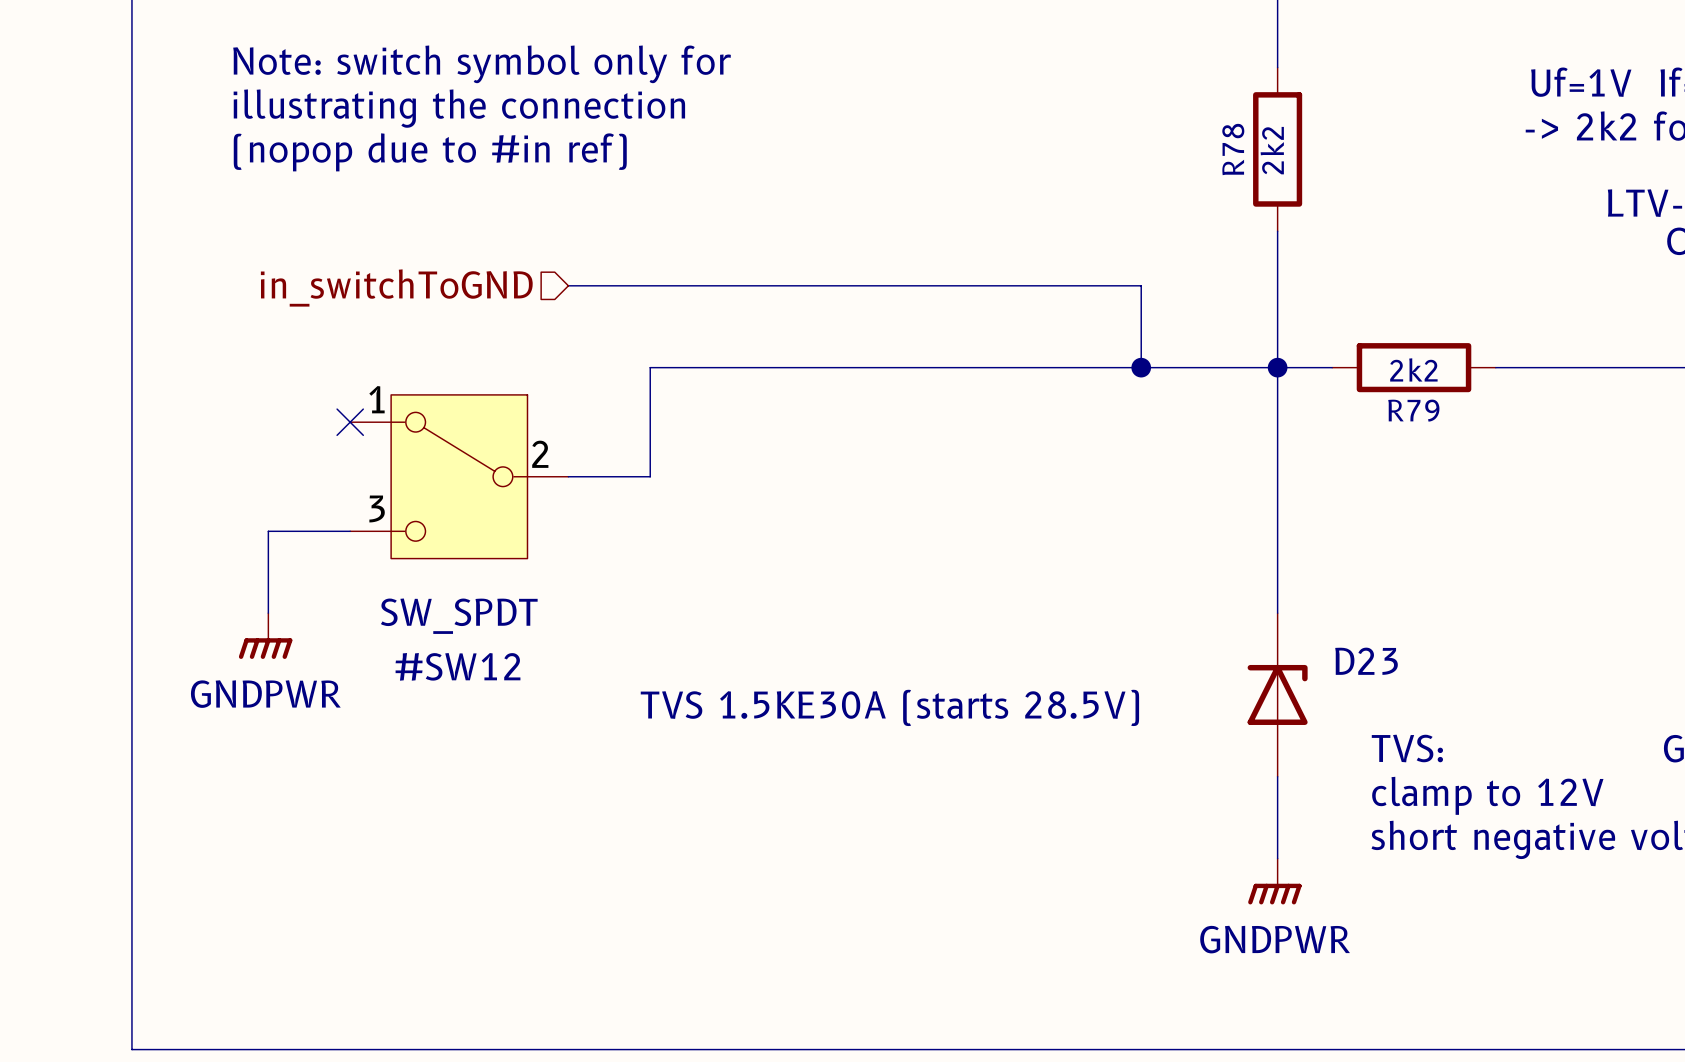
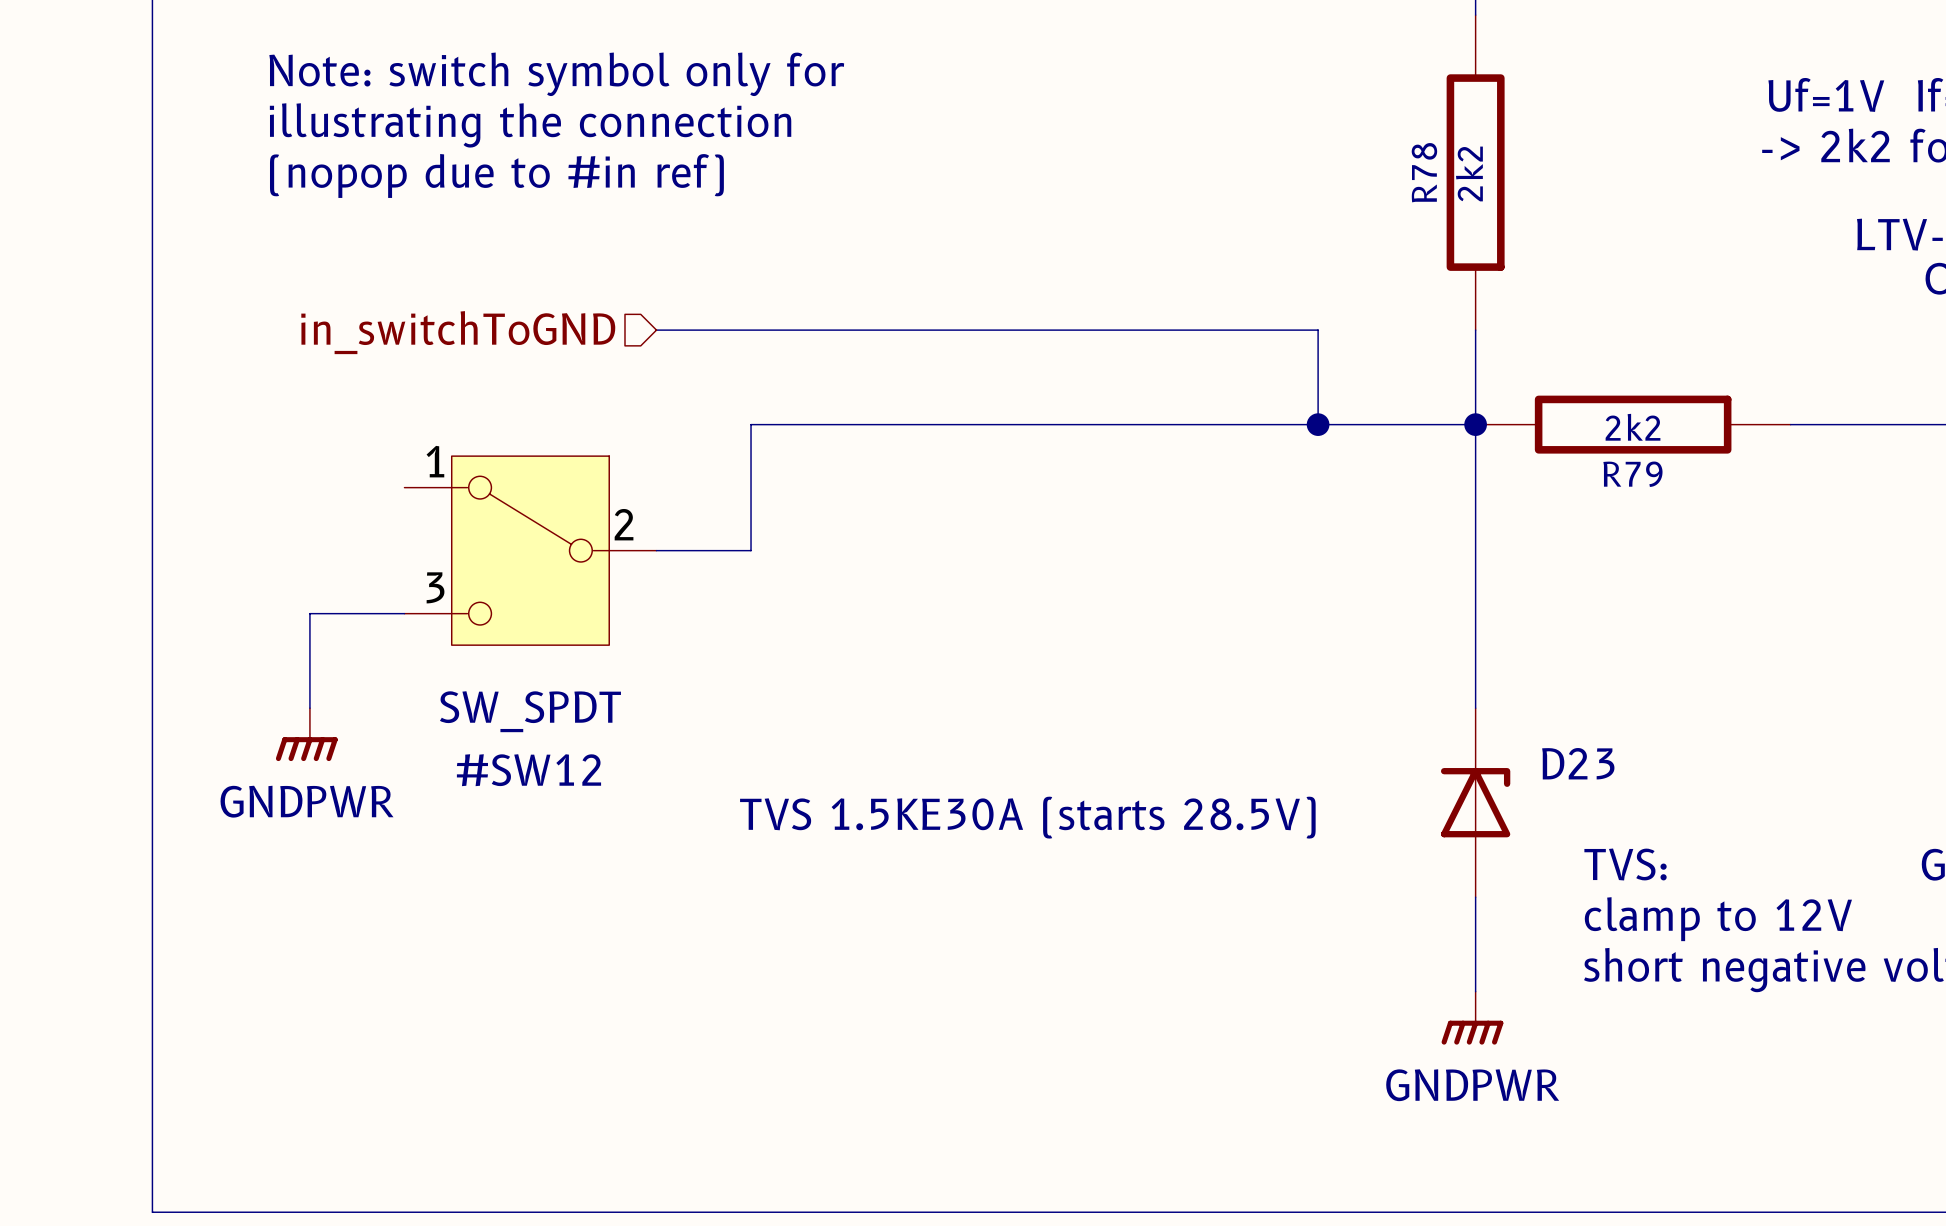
R78 symbol: [1253, 67, 1303, 232] -> [1446, 15, 1505, 331]
R79 symbol: [1332, 343, 1496, 393] -> [1475, 395, 1791, 454]
no-connect mark: (350, 422) -> none

